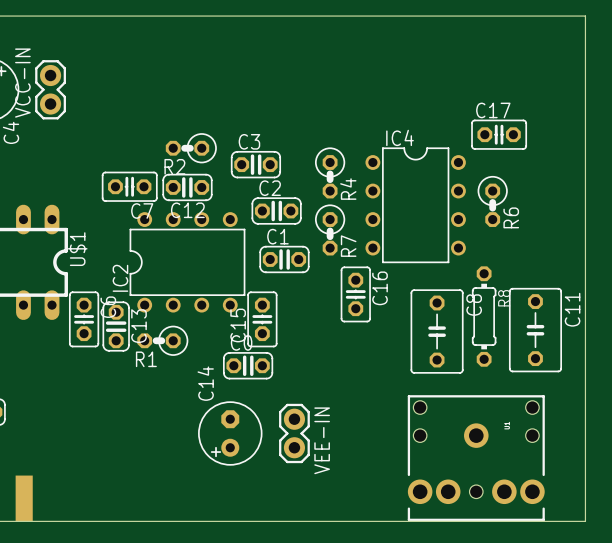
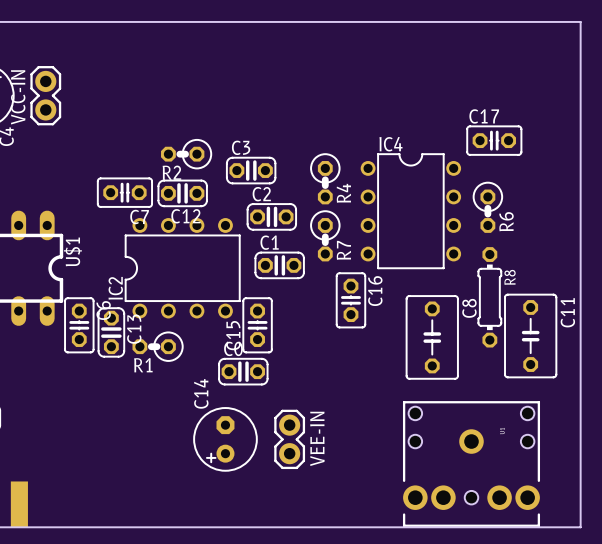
R8 position: (484, 316) -> (489, 297)

